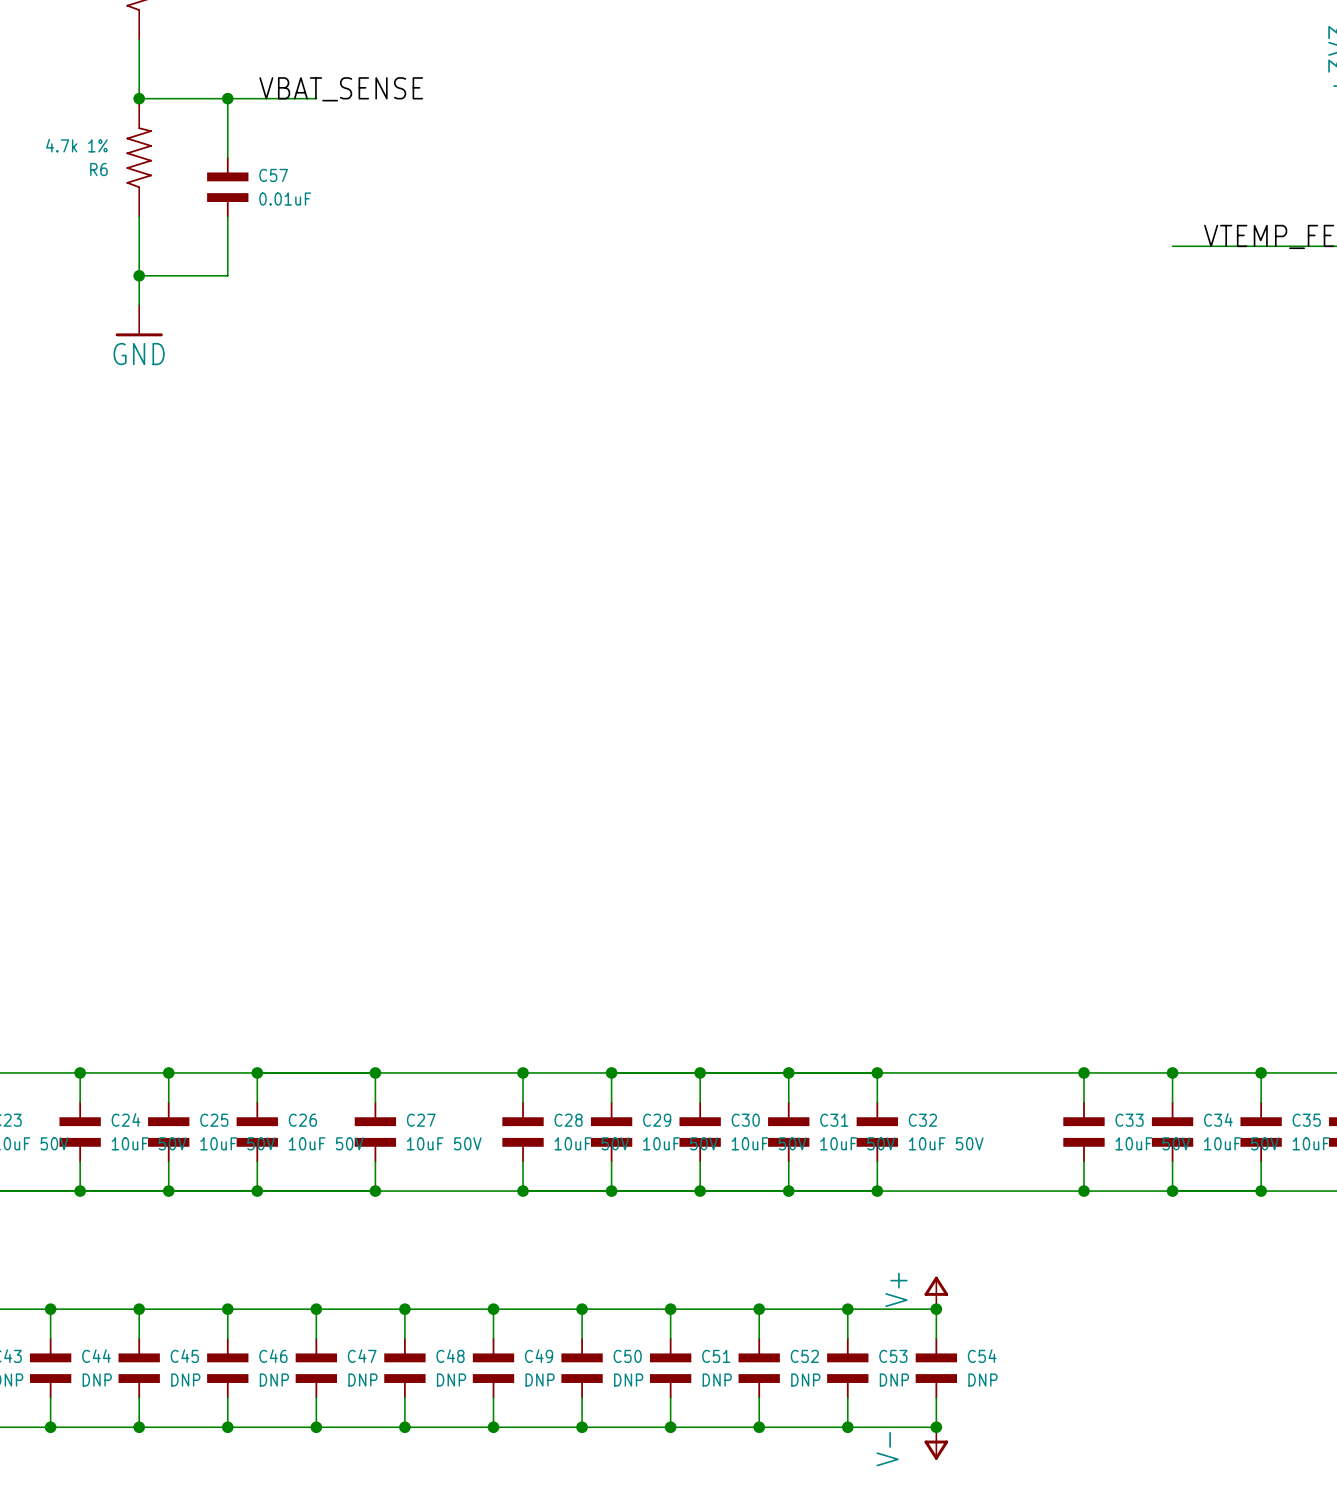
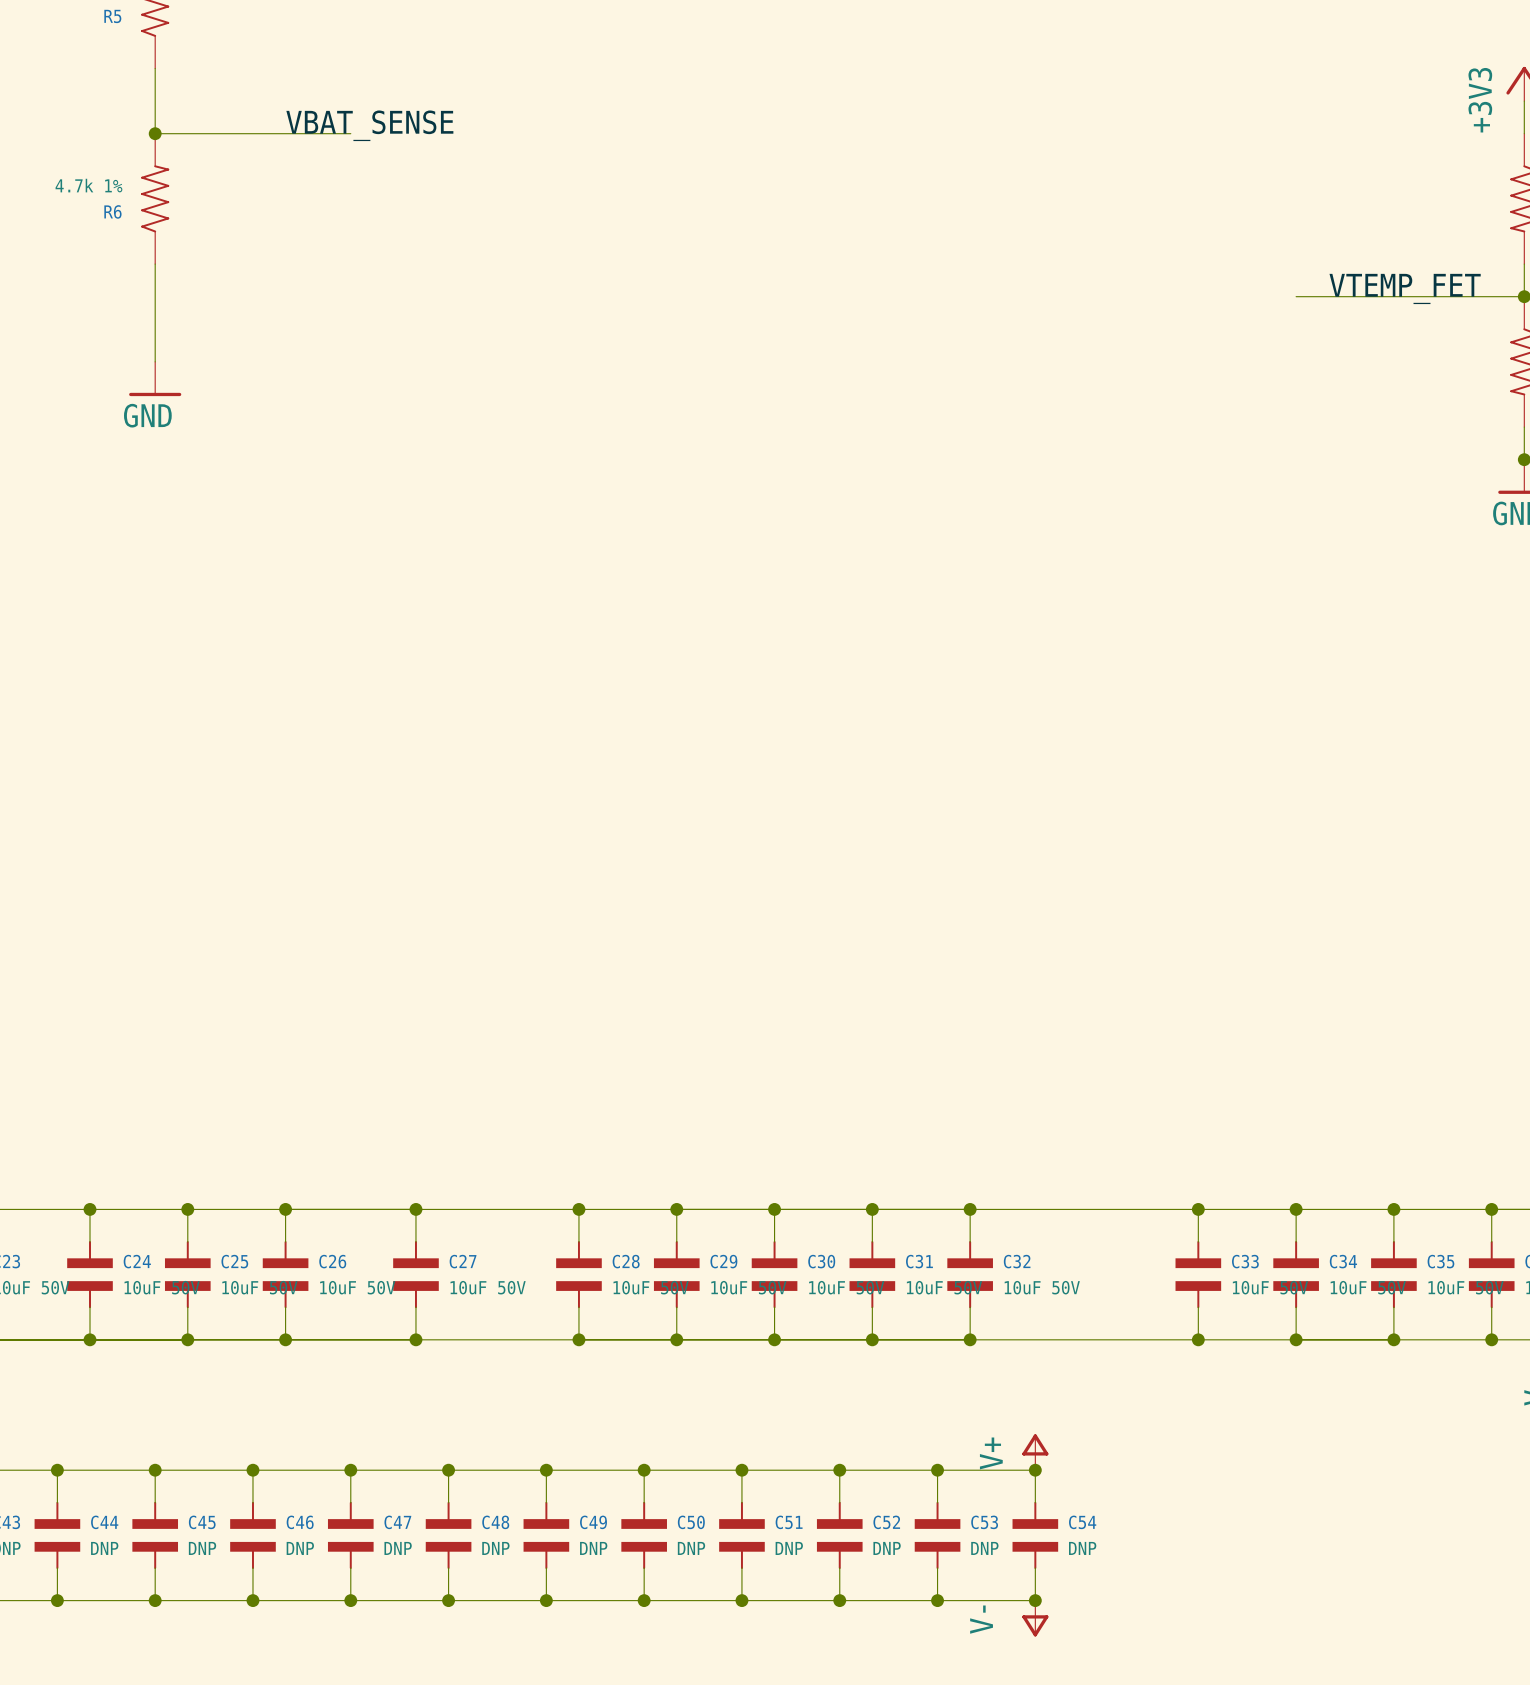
wire: (227, 98) (227, 157) -> none
junction: (227, 98) -> none
C57: 0.01uF (227, 187) -> none
wire: (227, 216) (227, 275) (139, 275) -> none
junction: (139, 275) -> none

